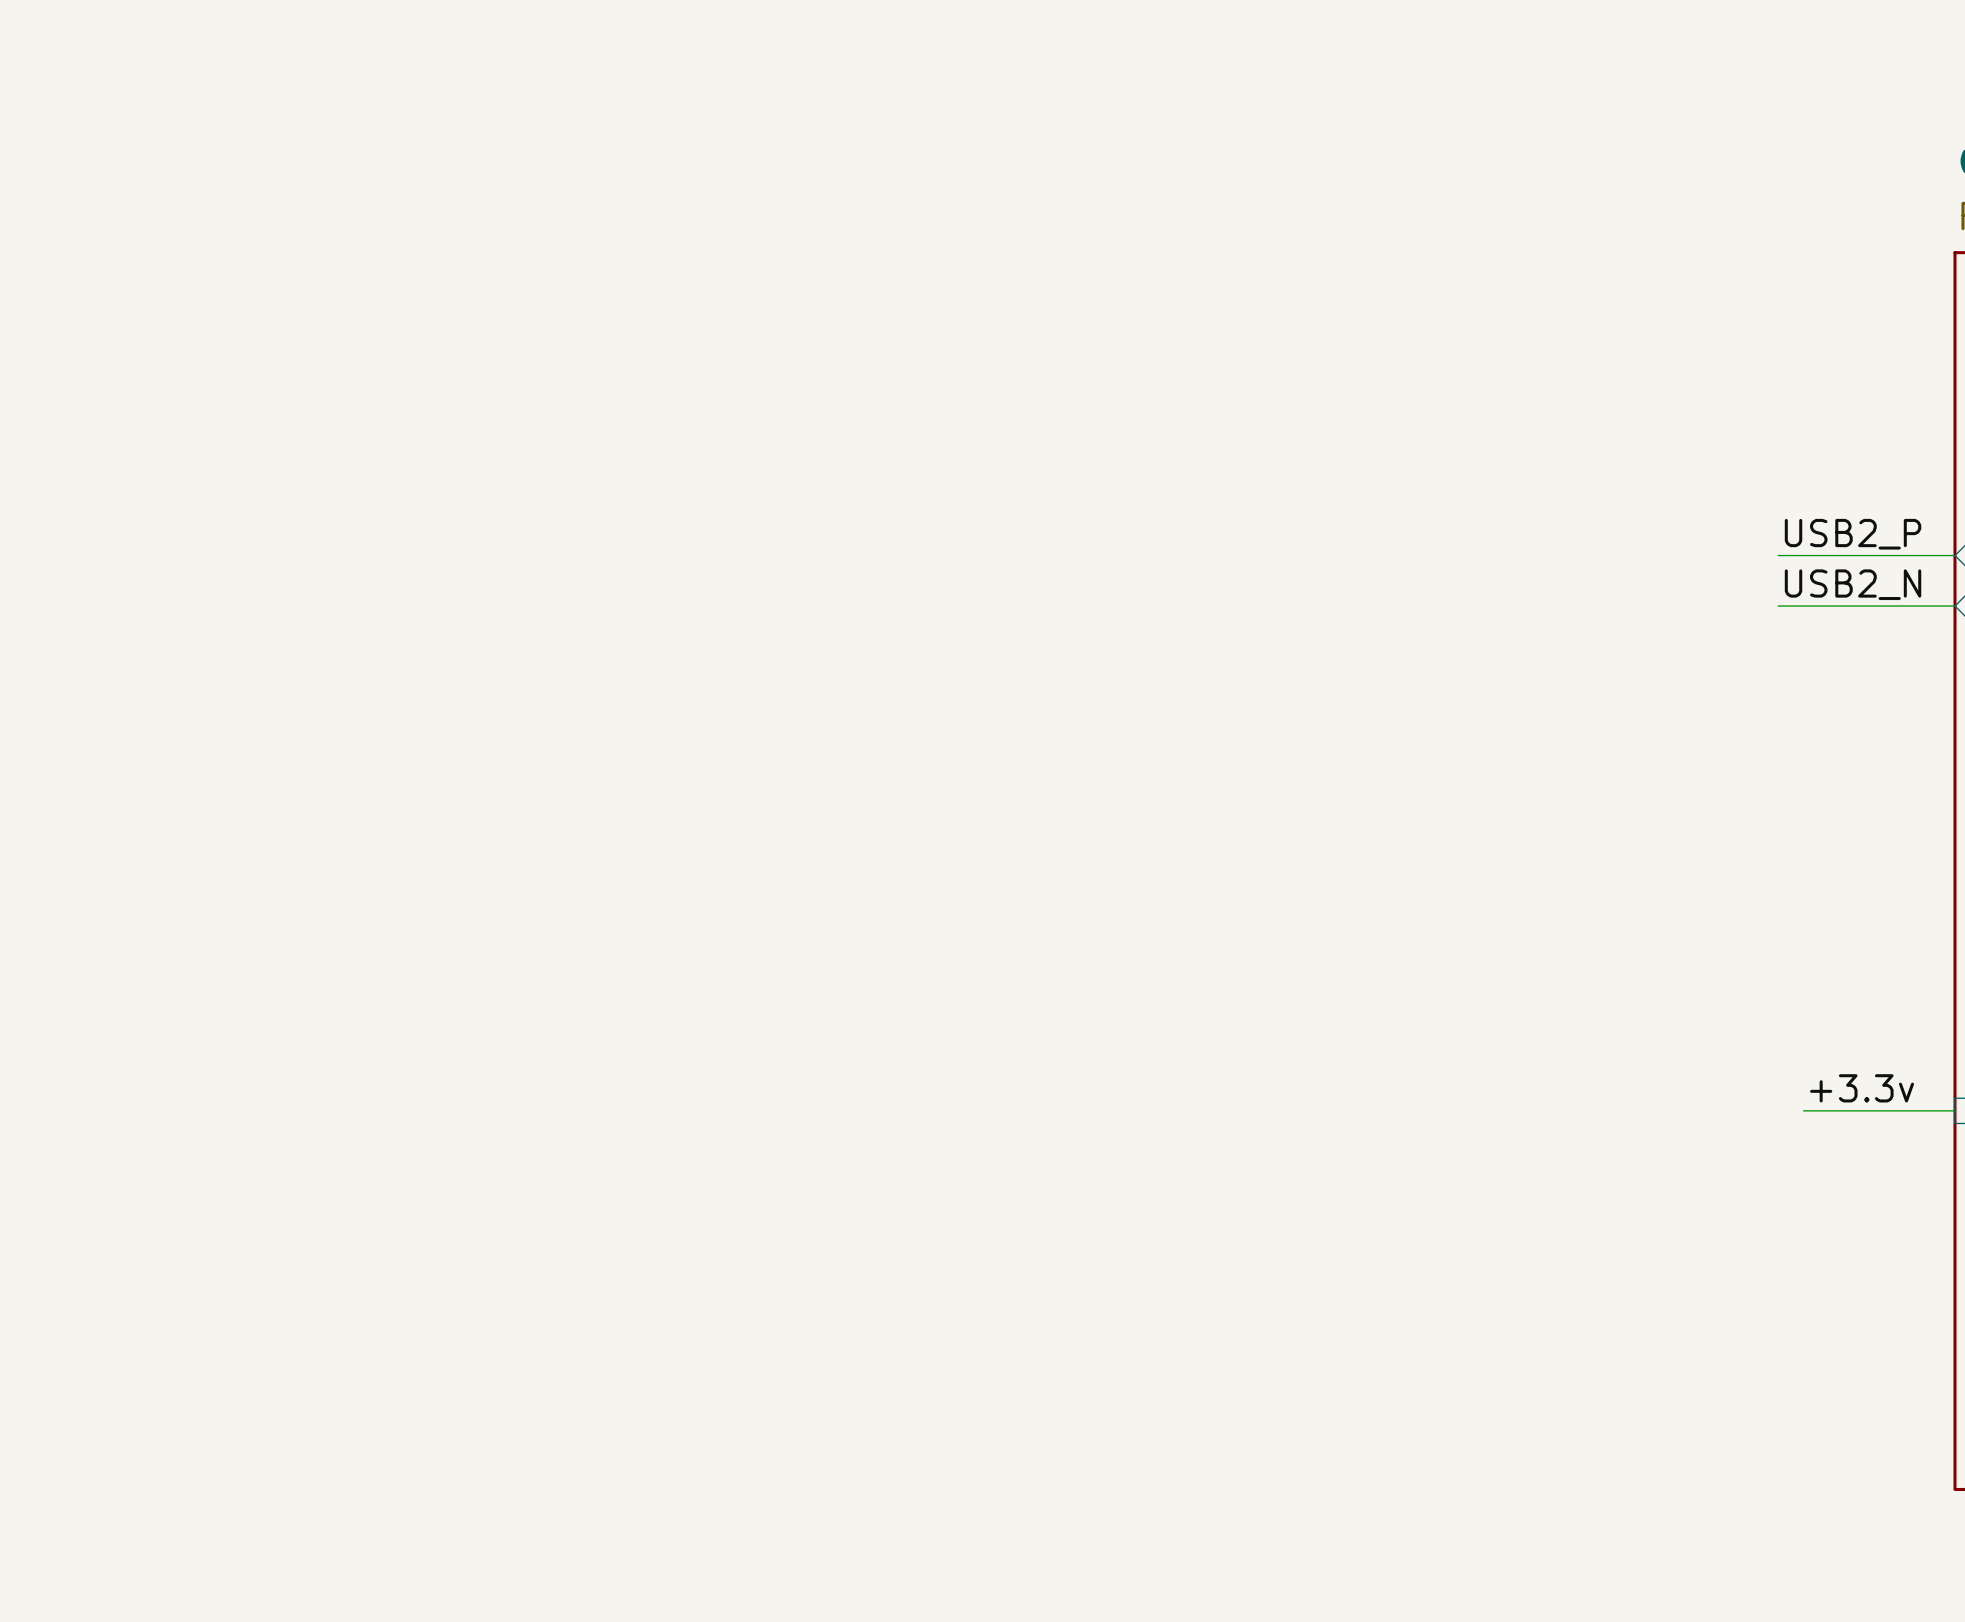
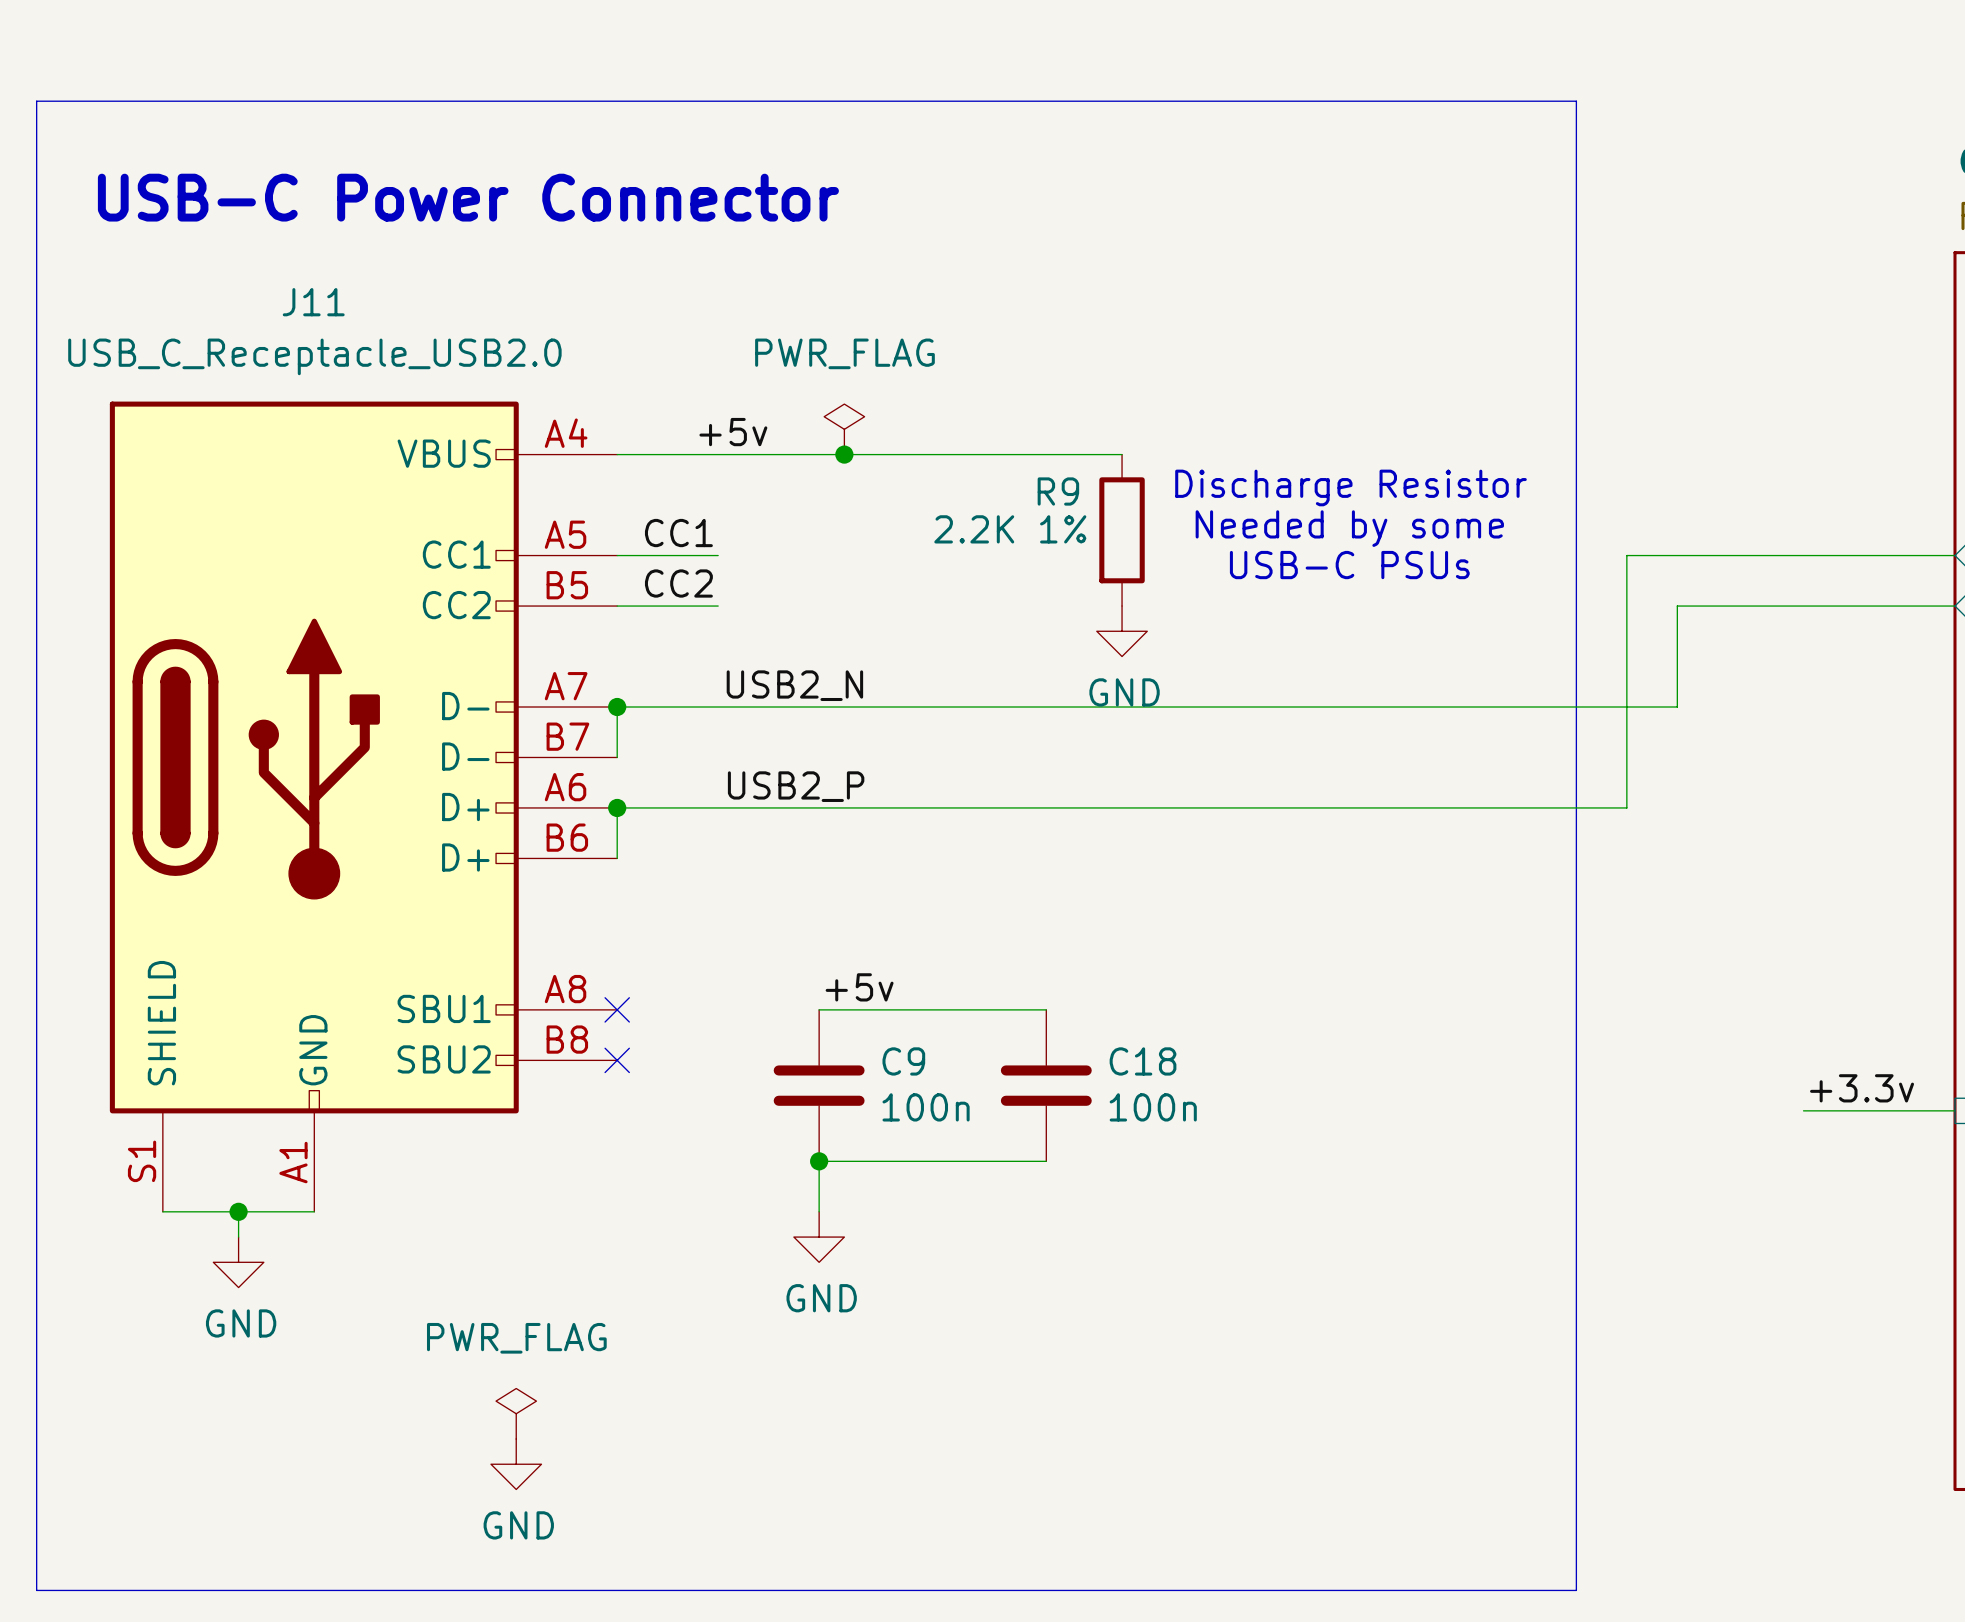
line: none -> (36, 101) (1576, 101) (1576, 1590) (36, 1590) (36, 101)
text: none -> USB-C Power Connector (468, 197)
power symbol: none -> PWR_FLAG (844, 429)
label: none -> +5v (733, 432)
wire: none -> (617, 454) (1122, 454)
junction: none -> (844, 454)
text: none -> Discharge Resistor (1351, 487)
text: none -> Needed by some (1349, 528)
R9: none -> 2.2K 1% (1122, 530)
label: none -> CC1 (678, 533)
label: USB2_P (1853, 534) -> none
wire: none -> (617, 555) (718, 555)
wire: none -> (1778, 555) (1626, 555) (1626, 807) (617, 807) (617, 858)
text: none -> USB-C PSUs (1349, 565)
label: none -> CC2 (678, 583)
label: USB2_N (1853, 584) -> none
wire: none -> (617, 606) (718, 606)
wire: none -> (1778, 606) (1677, 606) (1677, 707) (617, 707) (617, 757)
power symbol: none -> GND (1122, 631)
label: none -> USB2_N (794, 685)
junction: none -> (617, 707)
label: none -> USB2_P (796, 786)
J11: none -> USB_C_Receptacle_USB2.0 (363, 806)
junction: none -> (617, 807)
label: none -> +5v (859, 987)
no-connect mark: none -> (617, 1009)
wire: none -> (819, 1009) (1046, 1009)
no-connect mark: none -> (617, 1060)
C9: none -> 100n (819, 1085)
C18: none -> 100n (1046, 1085)
junction: none -> (819, 1161)
wire: none -> (1046, 1161) (819, 1161) (819, 1211)
wire: none -> (162, 1211) (314, 1211)
wire: none -> (238, 1211) (238, 1237)
junction: none -> (238, 1211)
power symbol: none -> GND (819, 1237)
power symbol: none -> GND (238, 1262)
power symbol: none -> PWR_FLAG (516, 1413)
power symbol: none -> GND (516, 1464)

